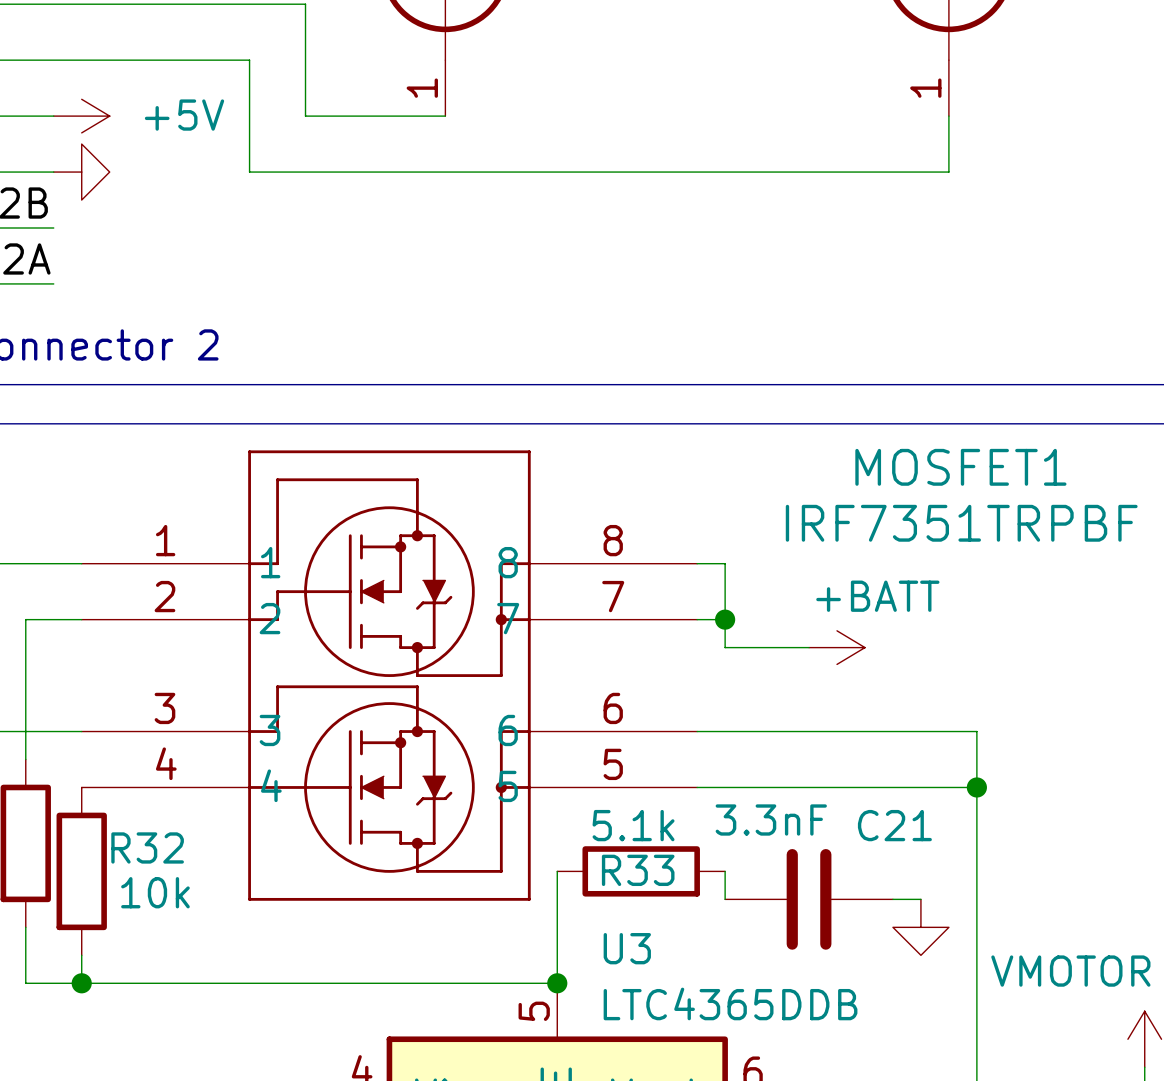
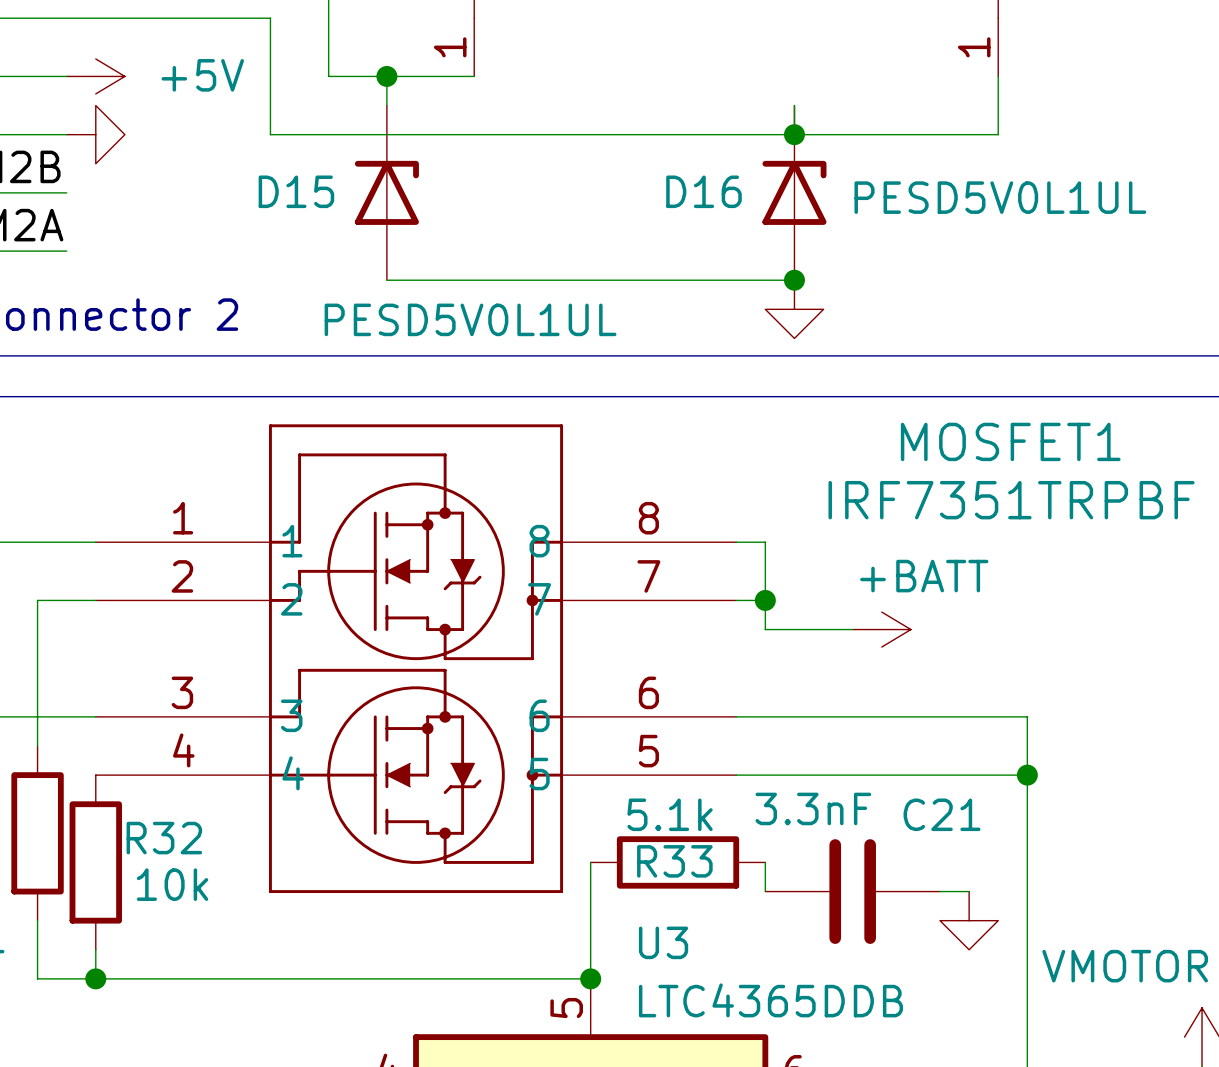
wire: none -> (386, 76) (386, 105)
junction: none -> (386, 76)
wire: none -> (794, 105) (794, 134)
junction: none -> (794, 134)
D15: none -> PESD5V0L1UL (386, 192)
D16: none -> PESD5V0L1UL (794, 192)
wire: none -> (386, 280) (794, 280)
junction: none -> (794, 280)
power symbol: none -> (794, 309)

